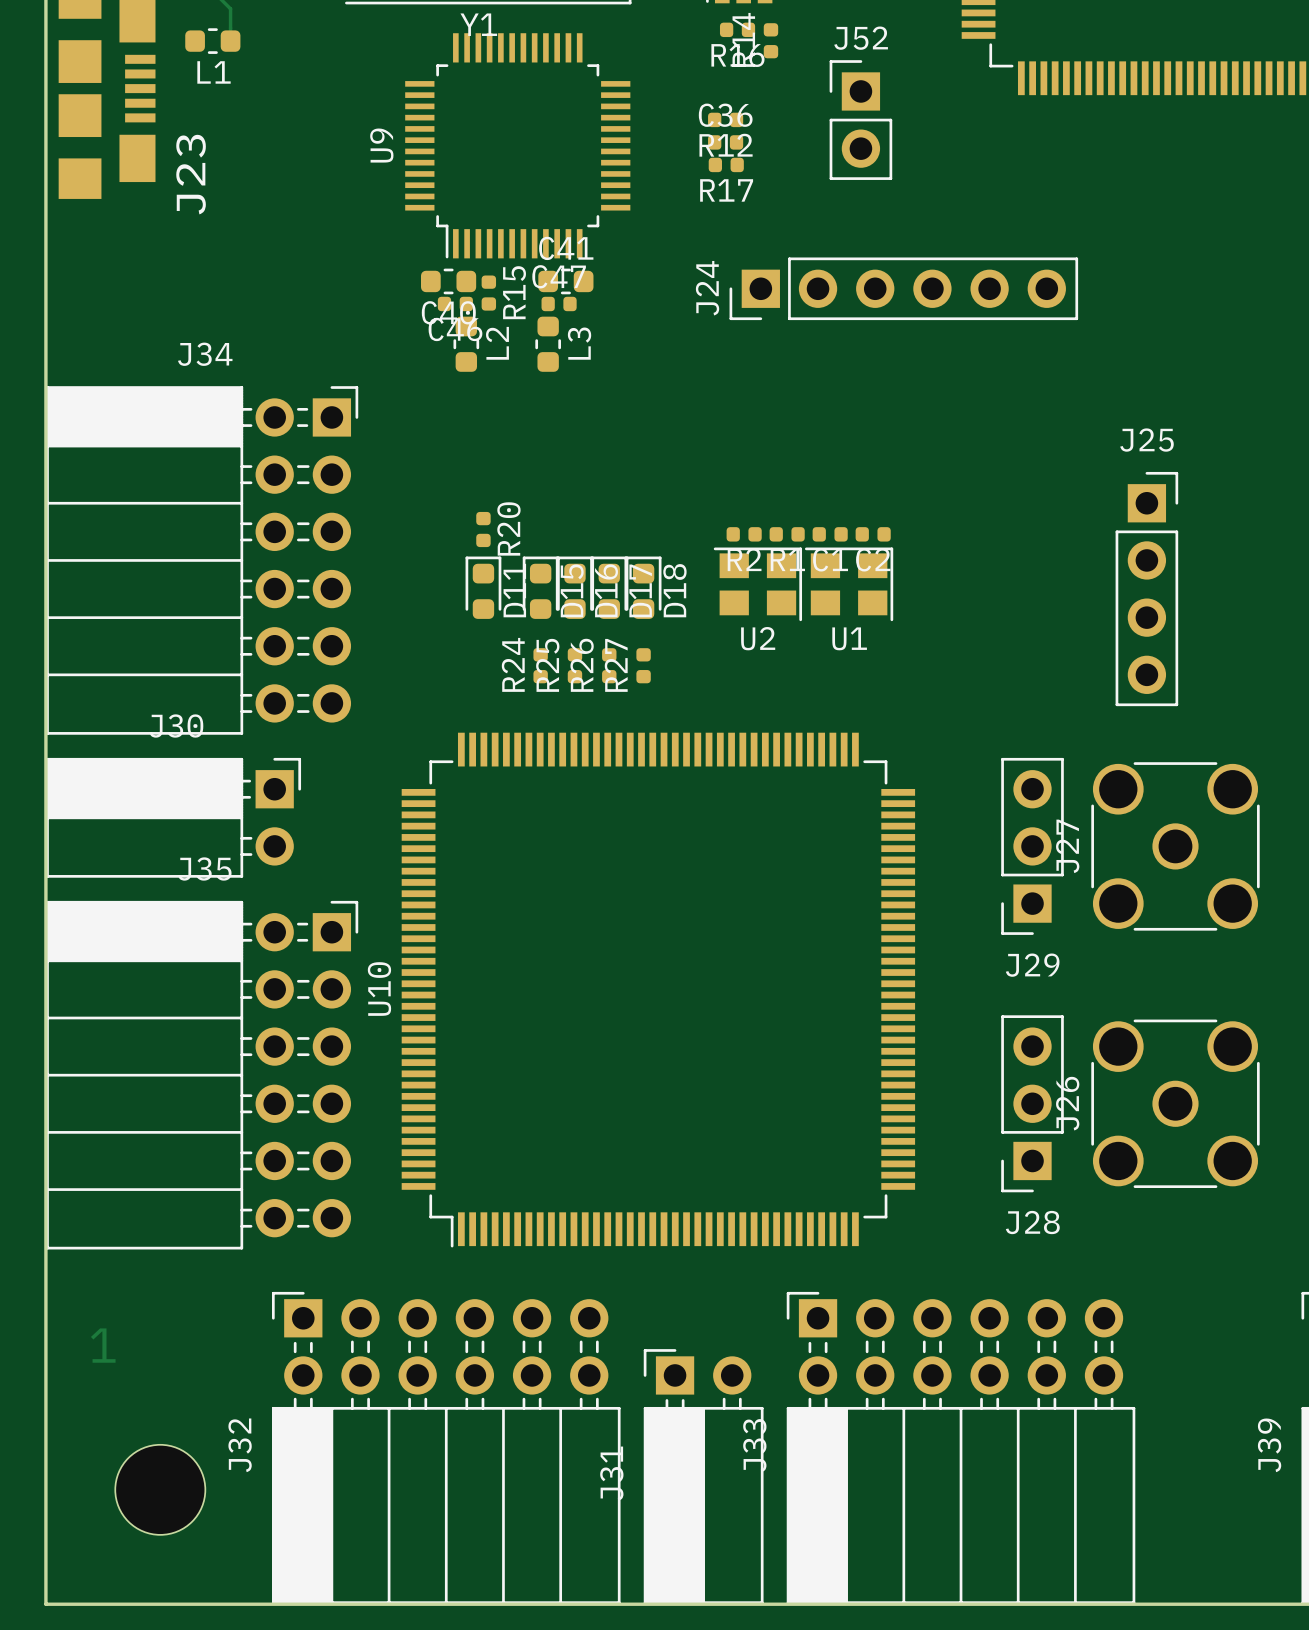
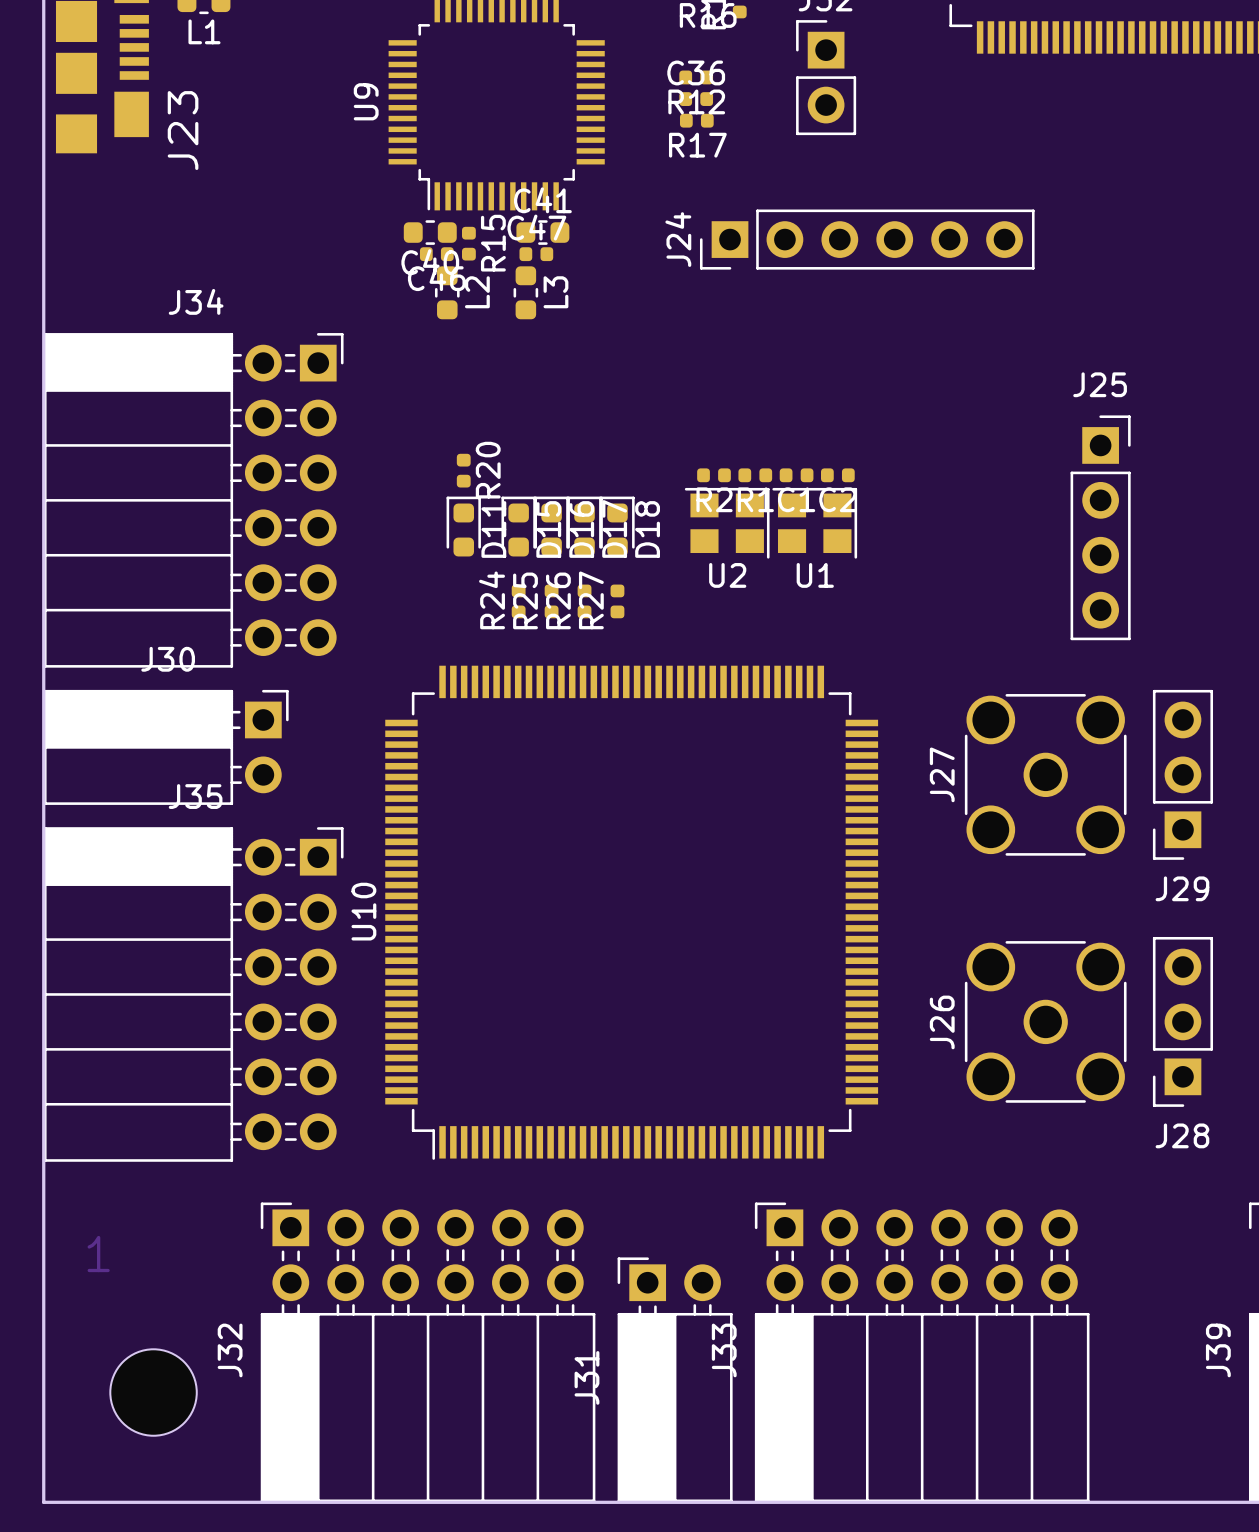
J29 position: (1032, 846) -> (1182, 774)
J27 position: (1175, 846) -> (1045, 774)
J28 position: (1032, 1103) -> (1182, 1021)
J26 position: (1175, 1103) -> (1045, 1021)

